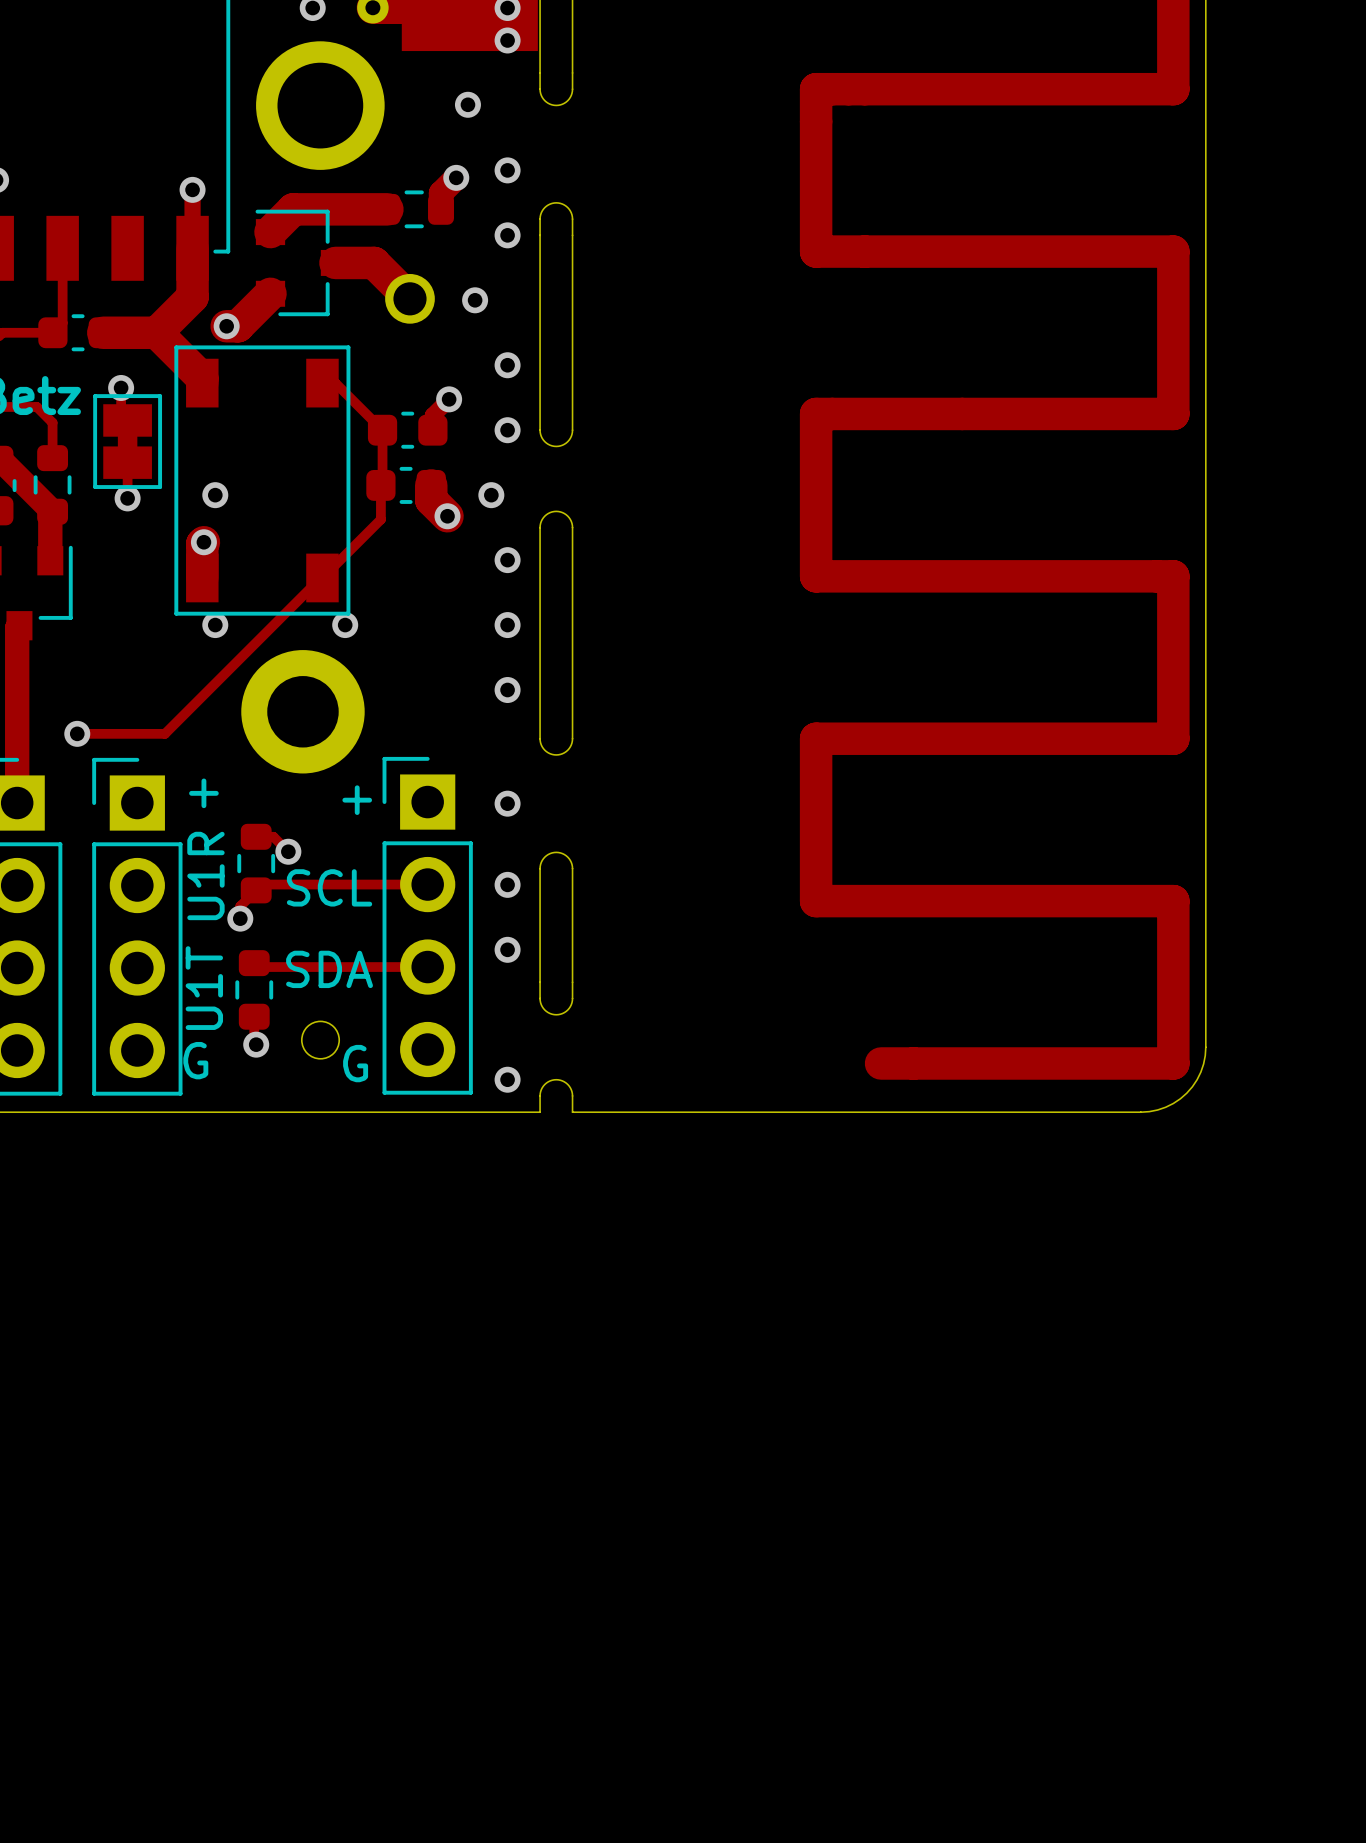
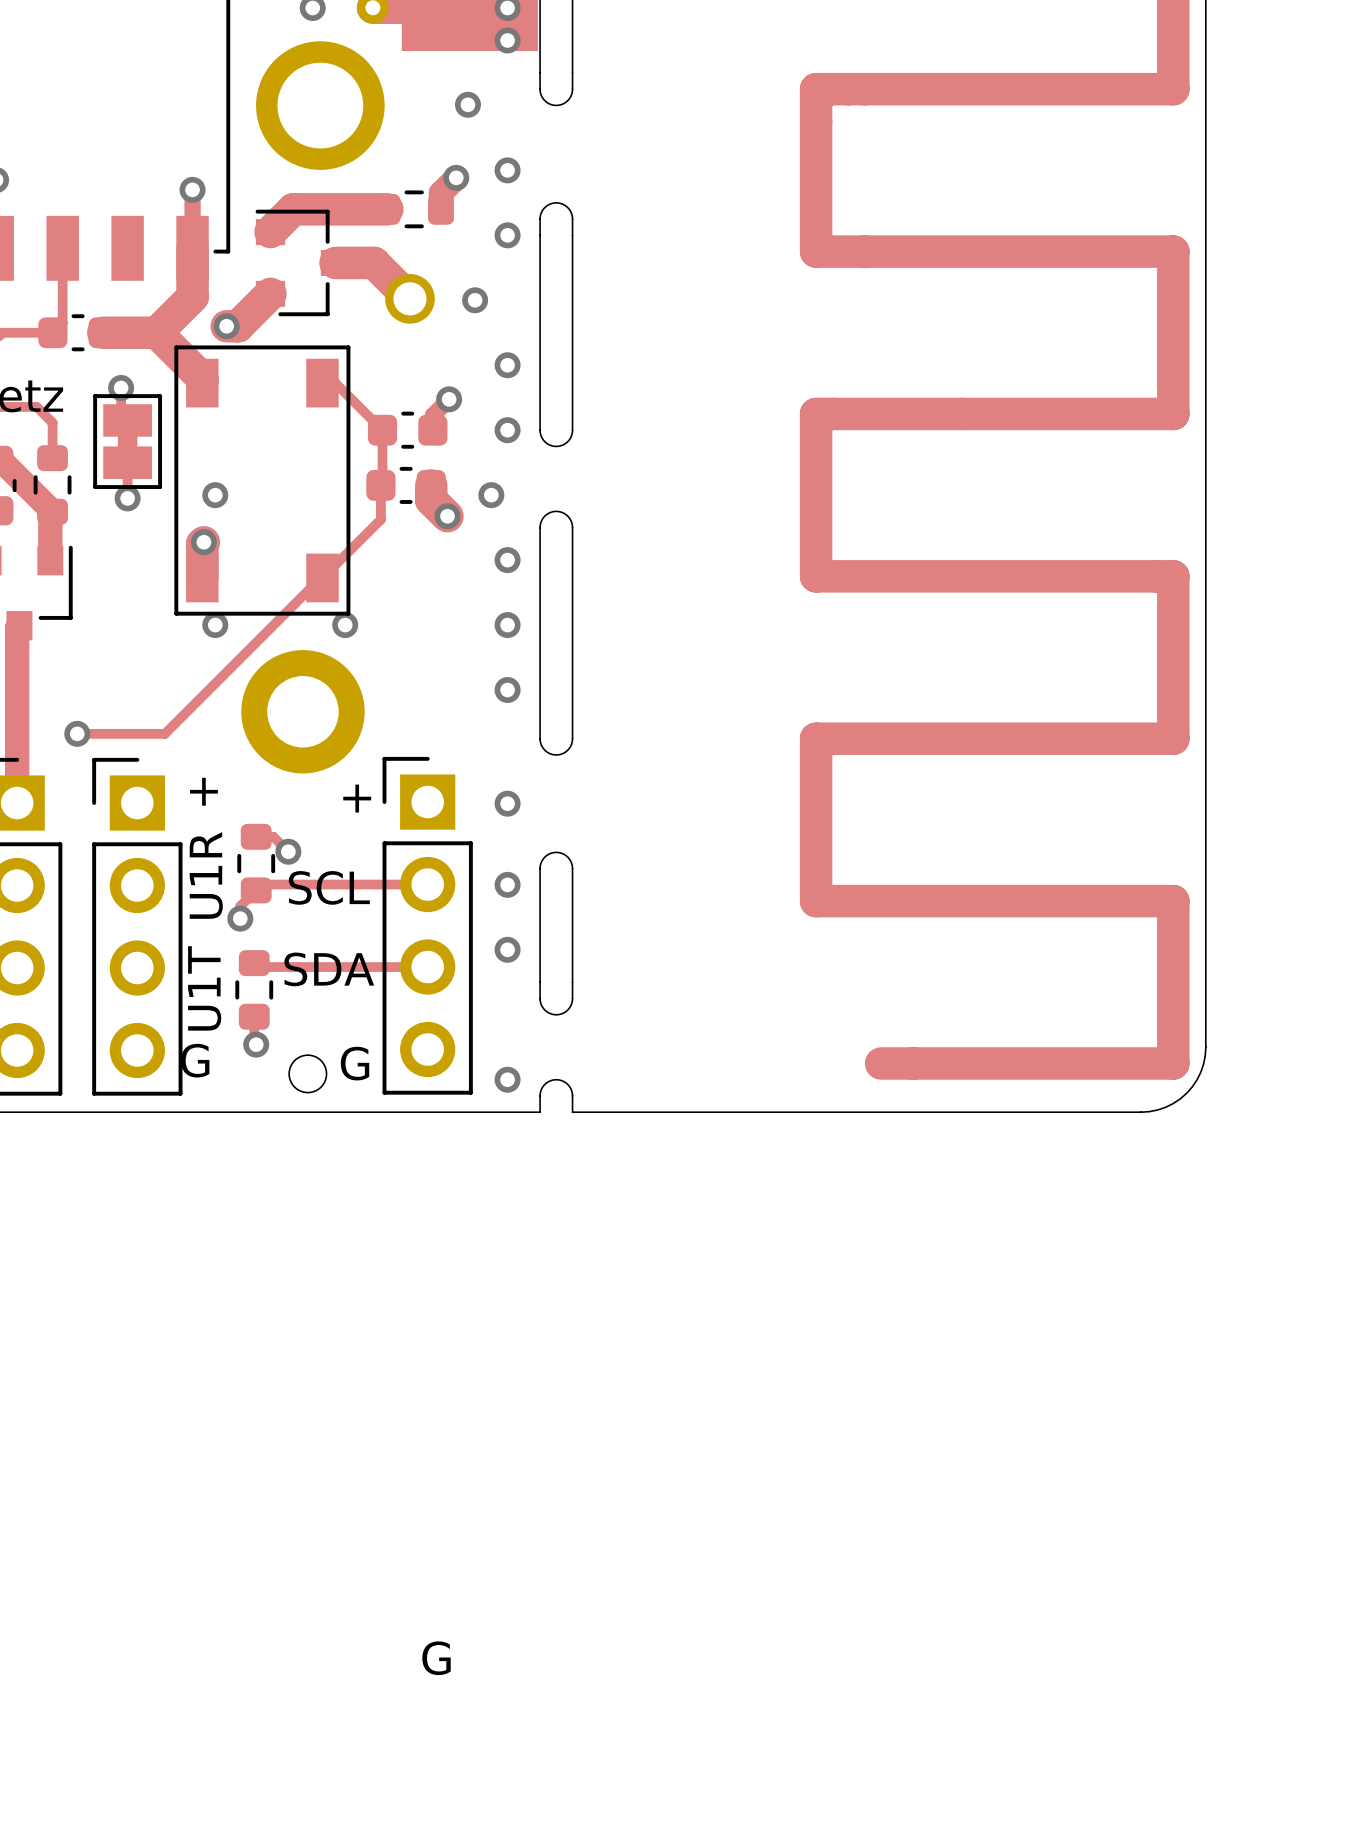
round board edge position: (320, 1040) -> (307, 1073)
text: none -> G (436, 1658)

